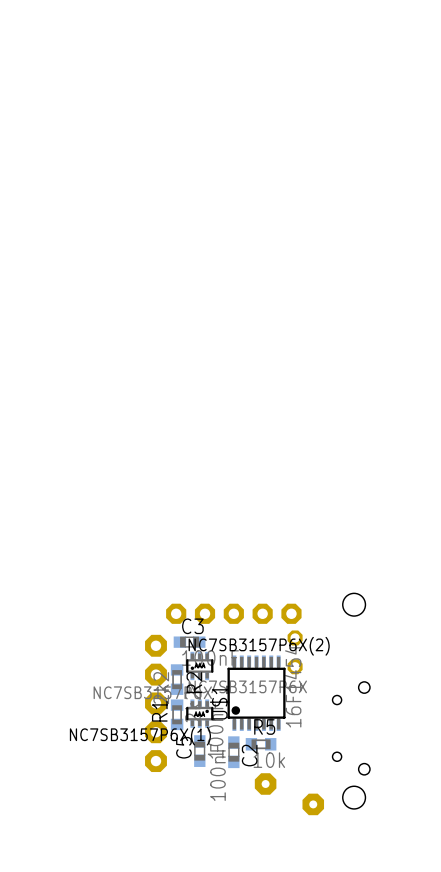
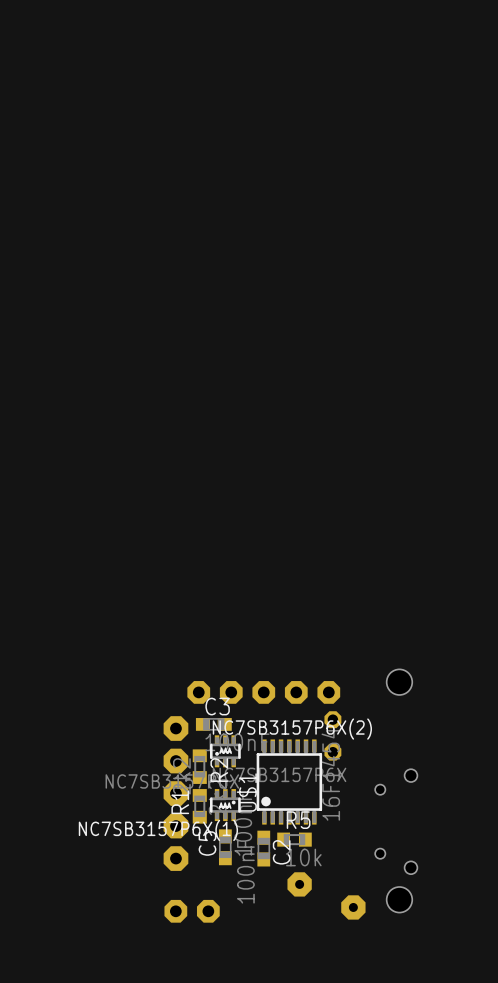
part: none -> (192, 911)

